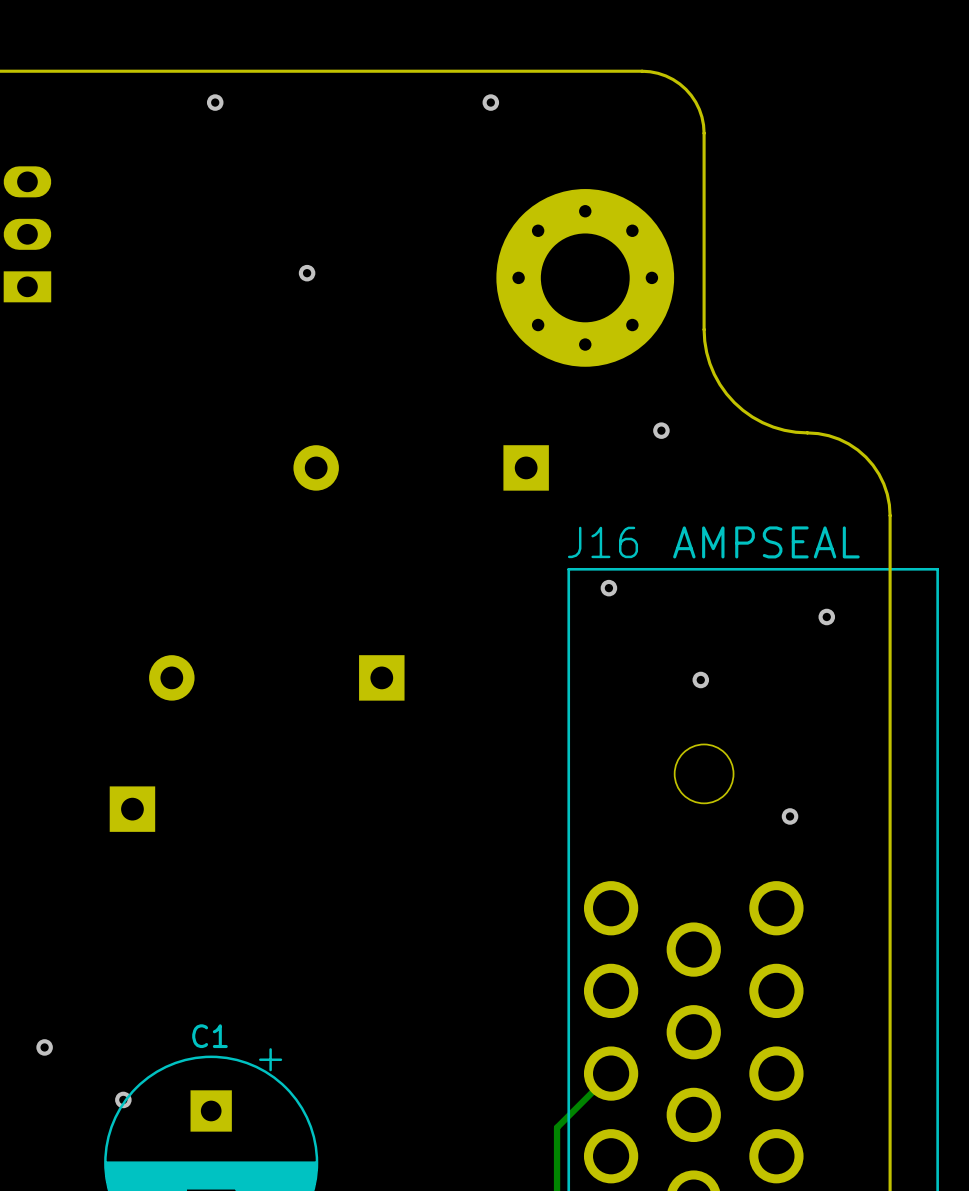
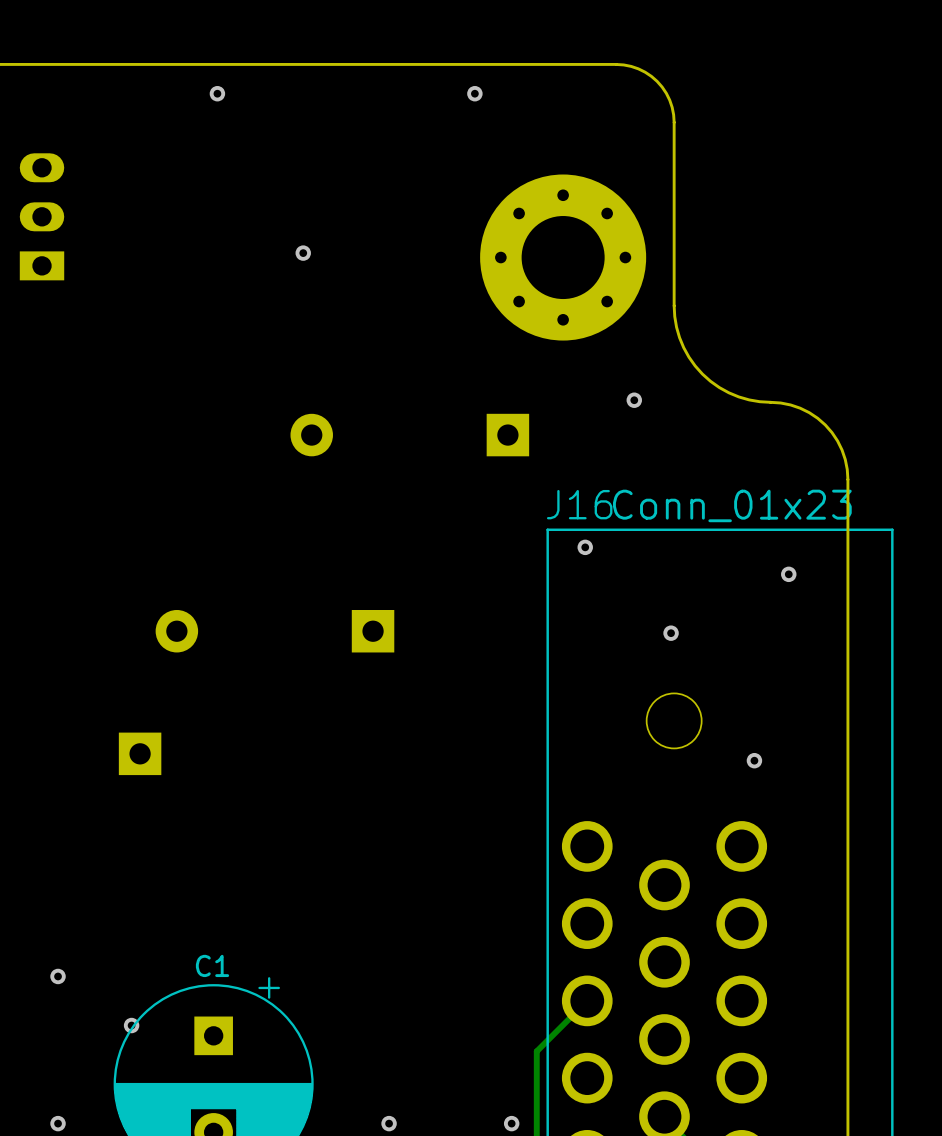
J16 value: AMPSEAL (766, 542) -> Conn_01x23 (732, 505)

